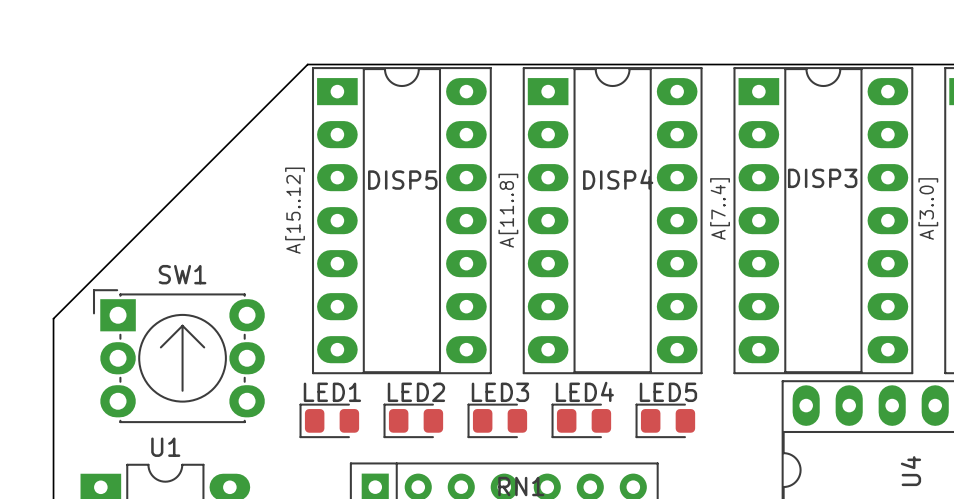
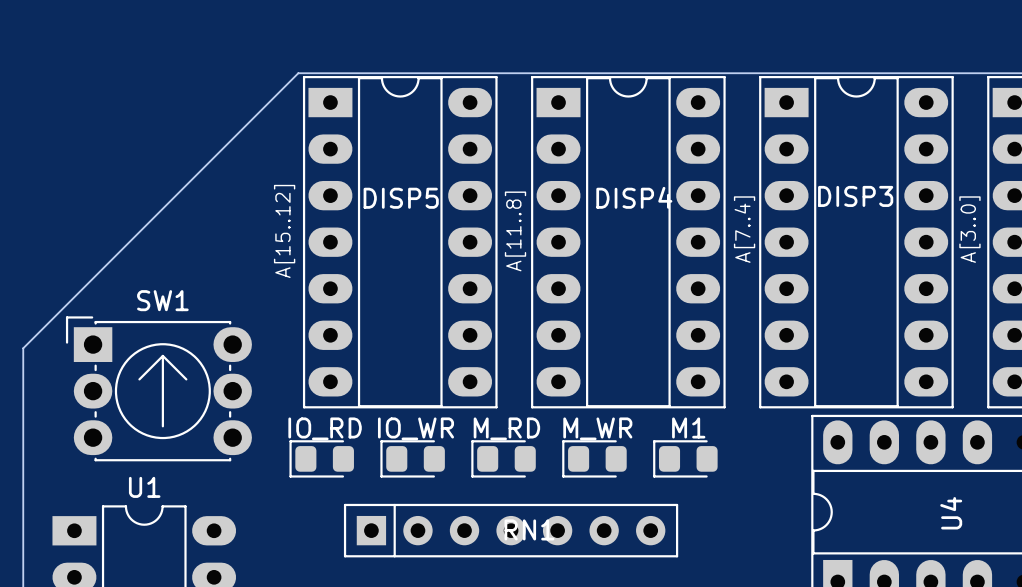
LED4 name: LED4 (584, 391) -> M_WR (597, 428)
LED1 name: LED1 (332, 392) -> IO_RD (325, 428)
LED2 name: LED2 (416, 392) -> IO_WR (415, 428)
LED3 name: LED3 (500, 392) -> M_RD (506, 428)
LED5 name: LED5 (668, 392) -> M1 (688, 427)

